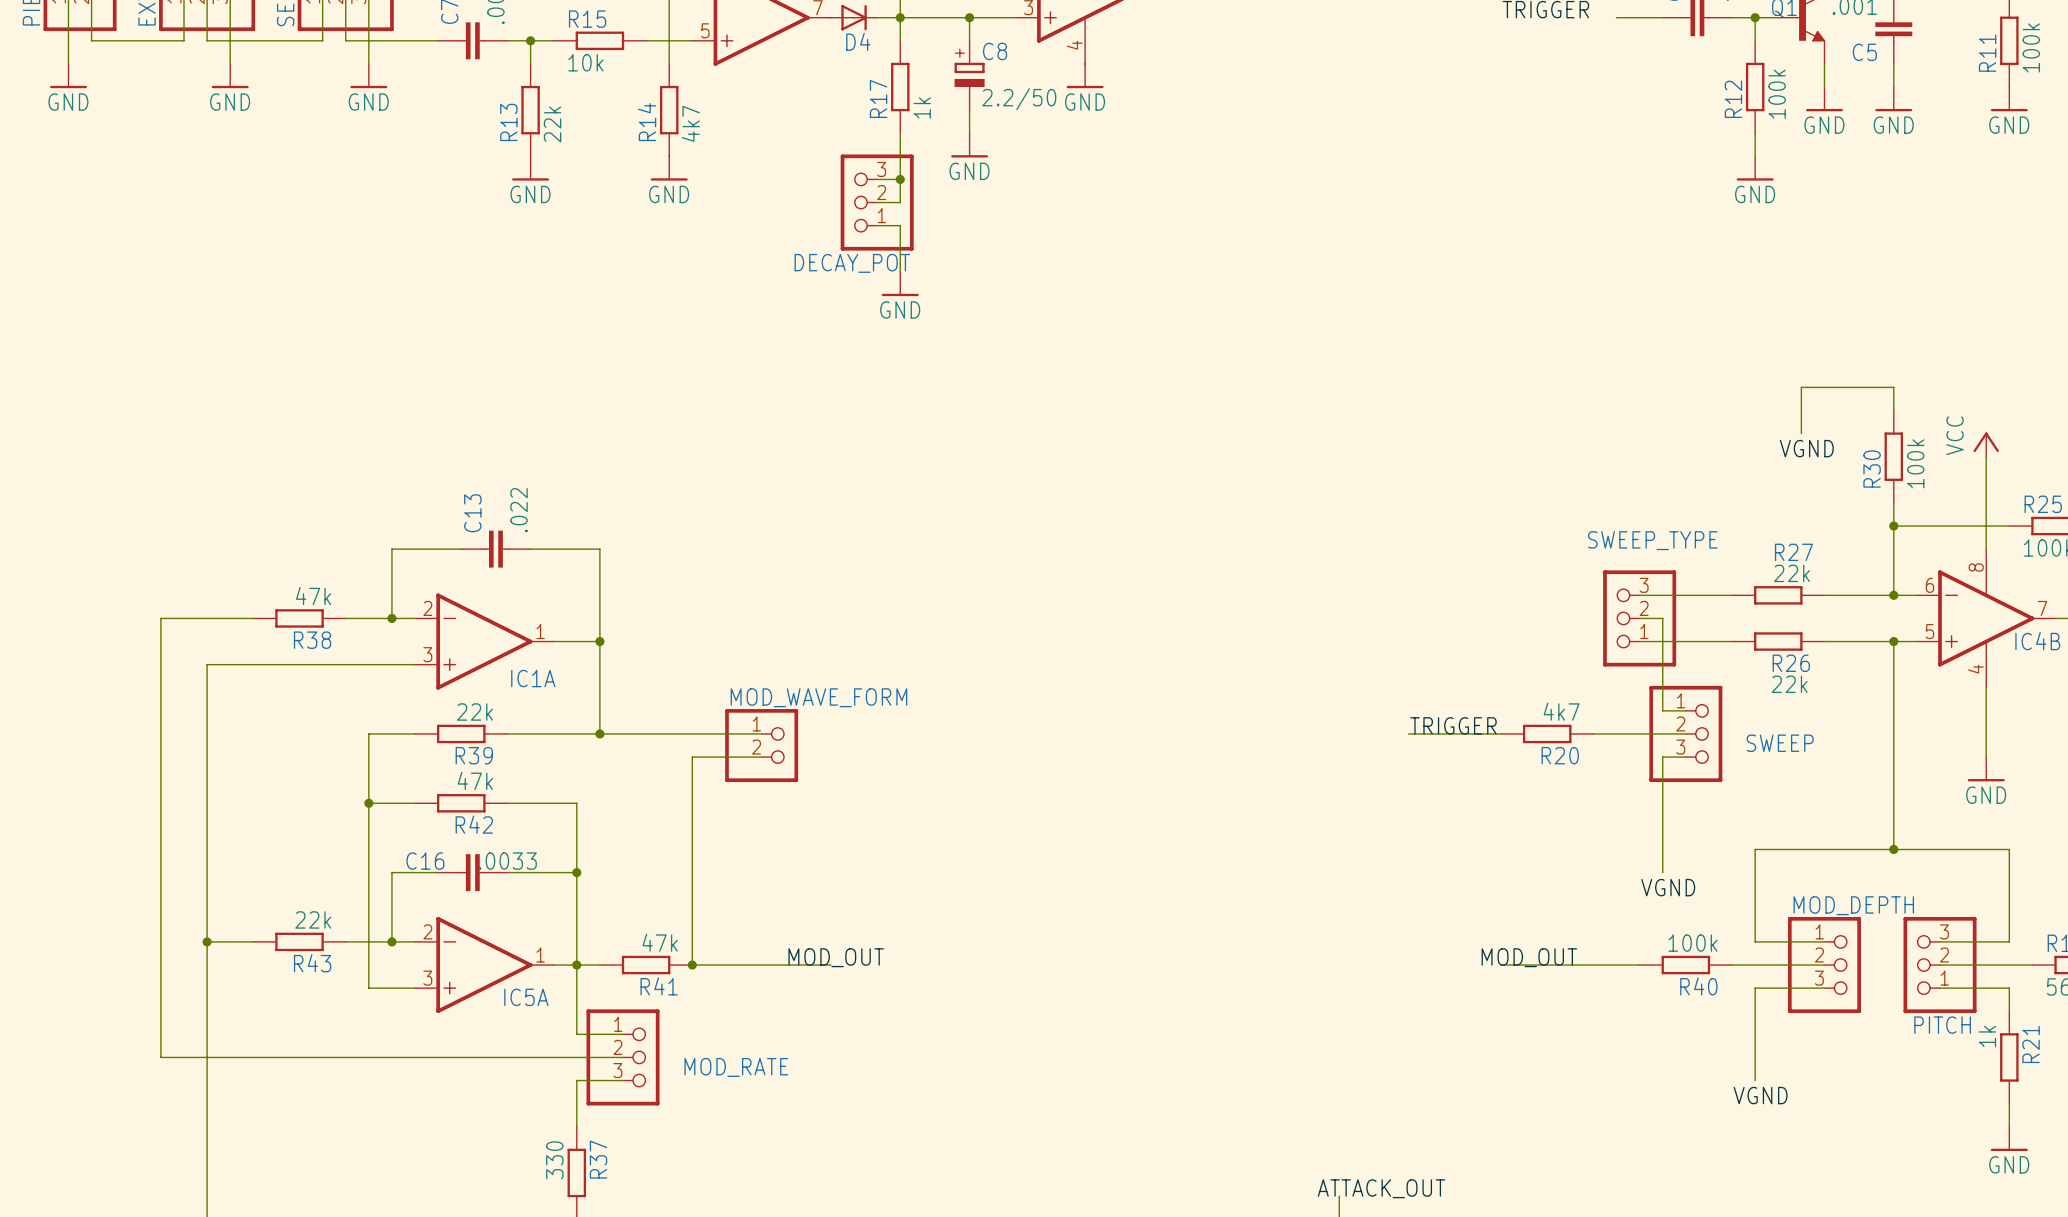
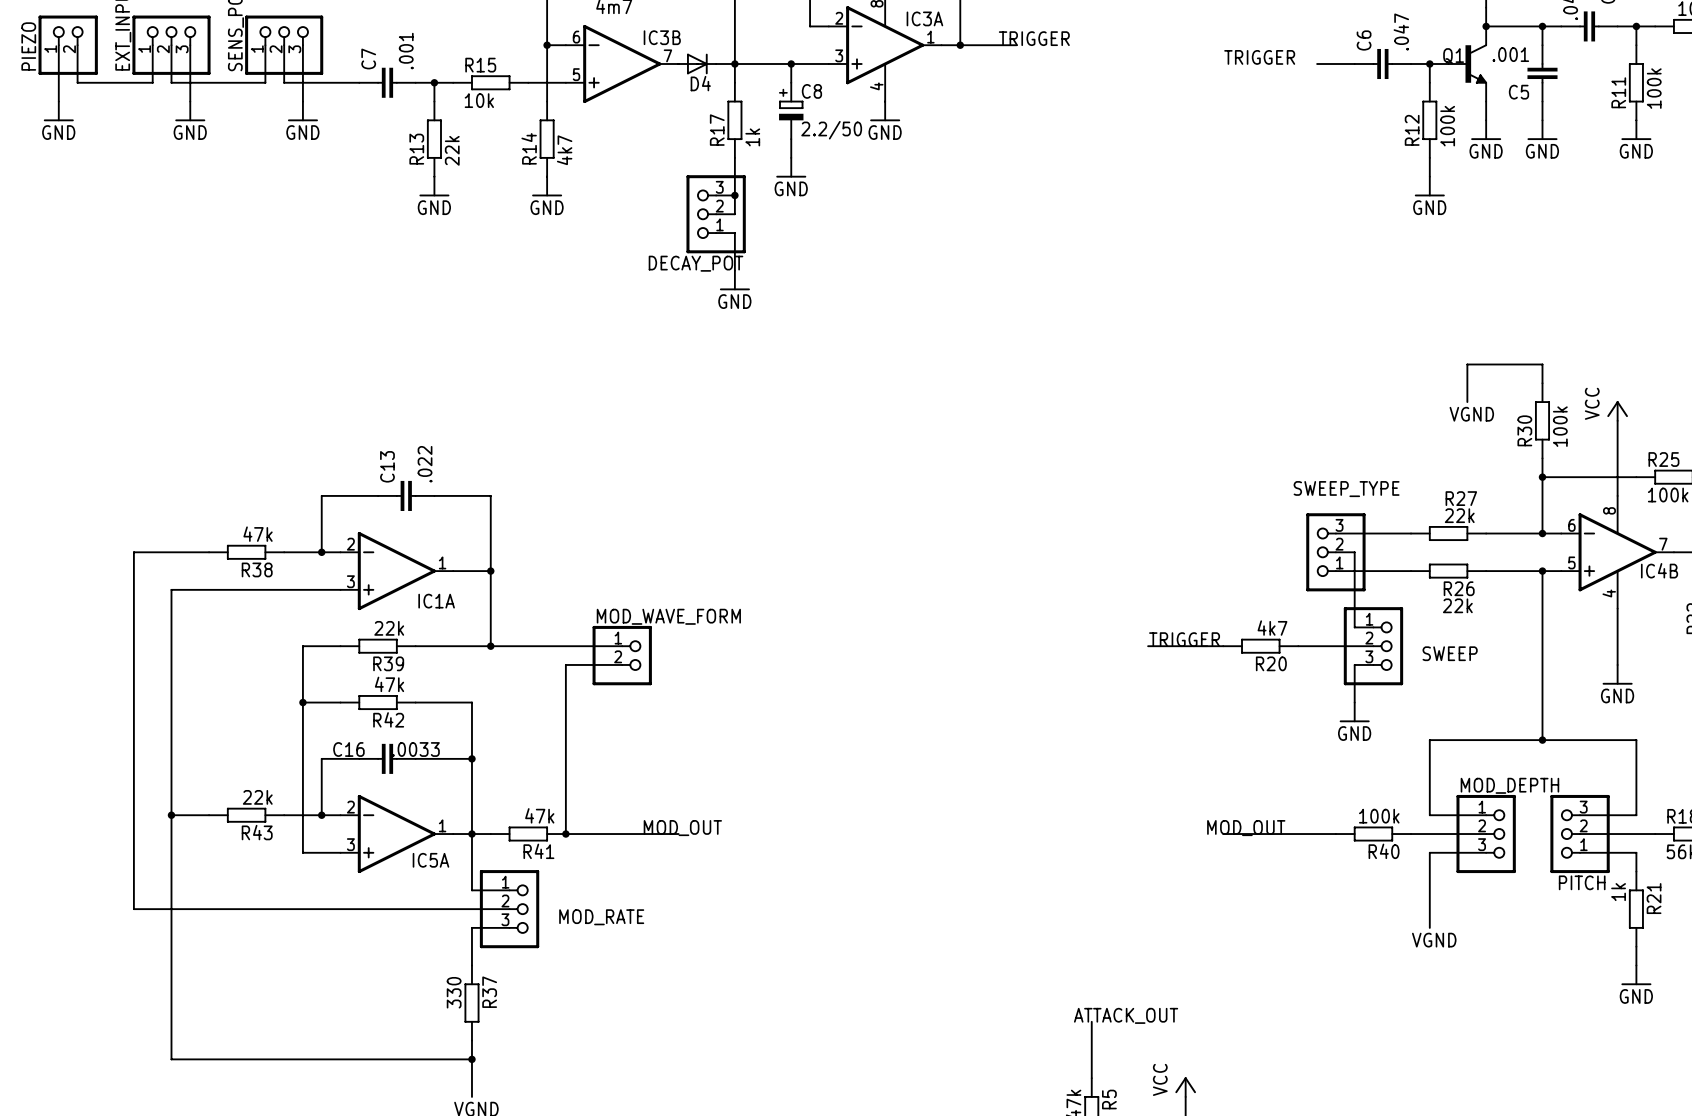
wire: (1662, 803) (1662, 872) -> none
power symbol: none -> GND (1354, 712)
label: VGND (1668, 887) -> none

